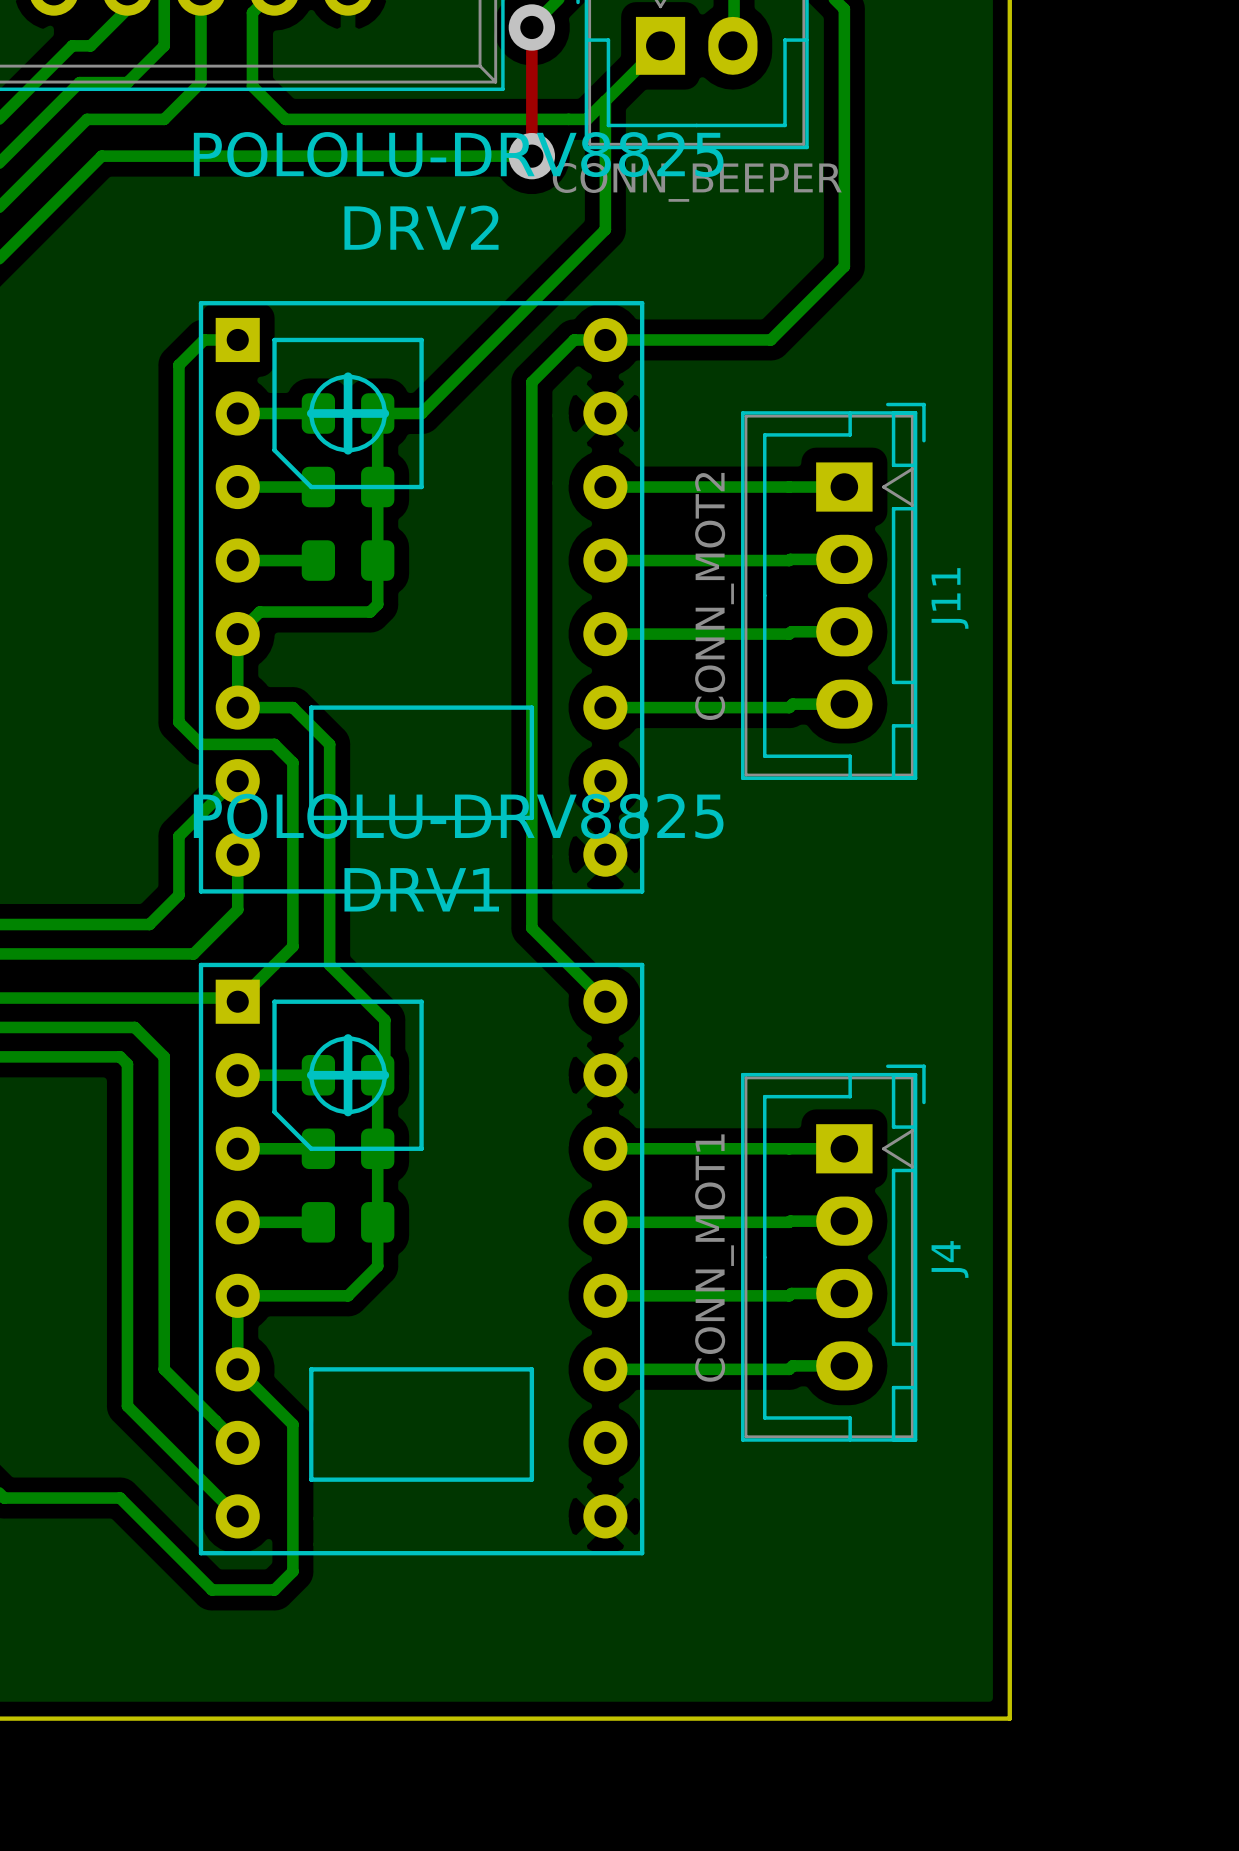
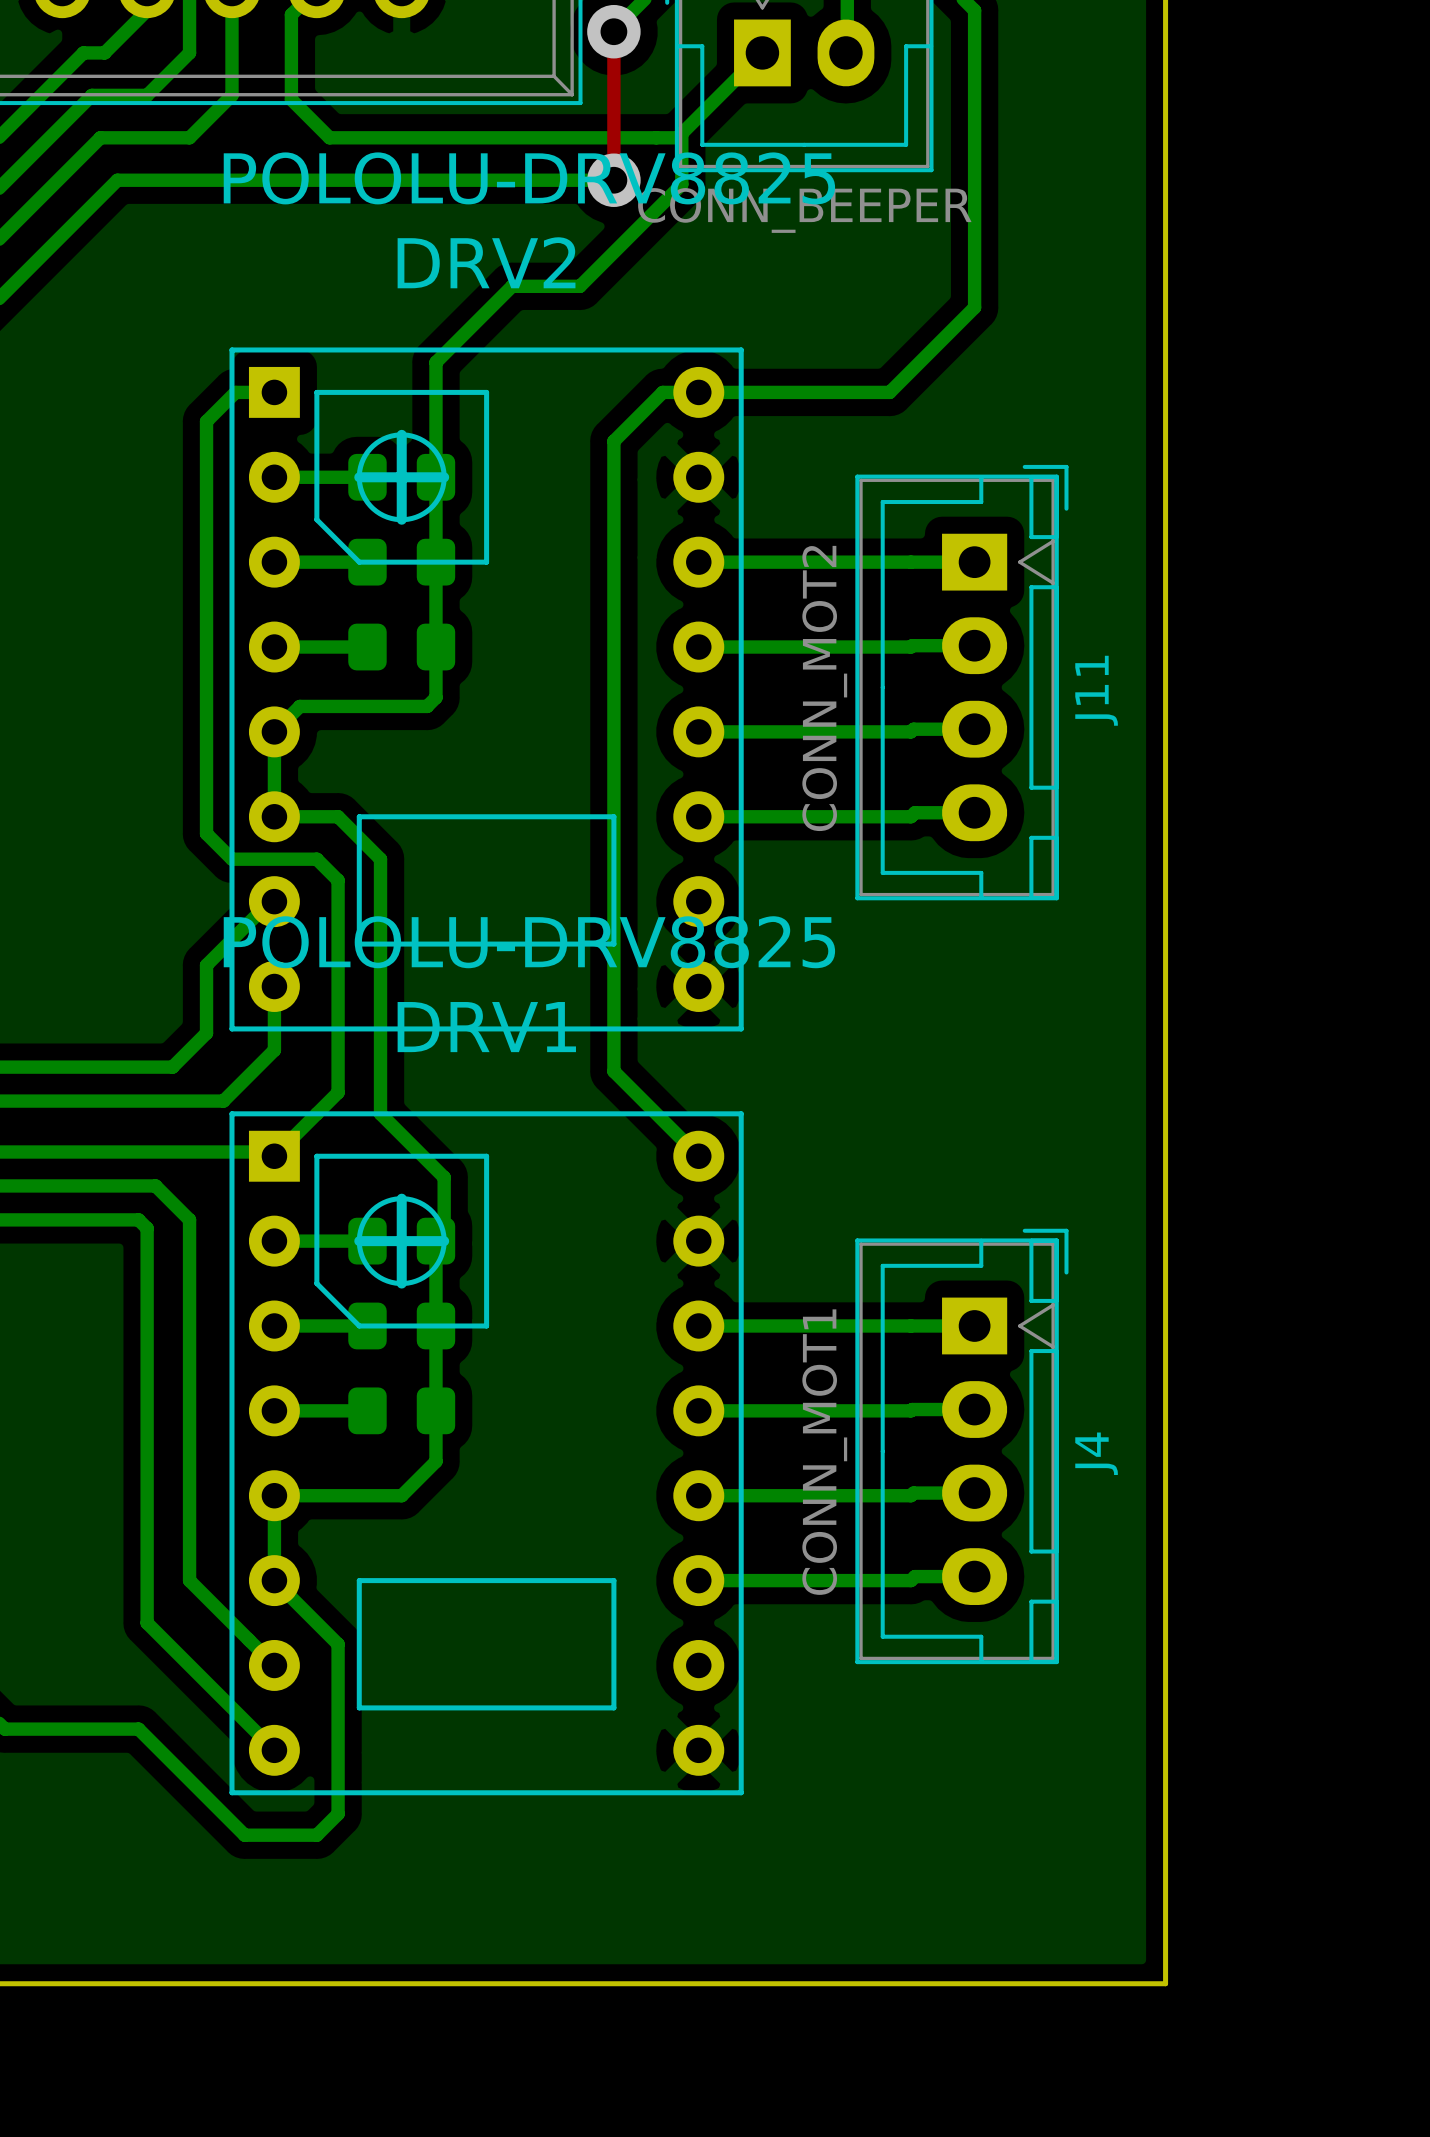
bottom track: (605, 101) (605, 229) (421, 413) (377, 413) -> (681, 133) (681, 184) (579, 286) (512, 286) (435, 362) (435, 477)

